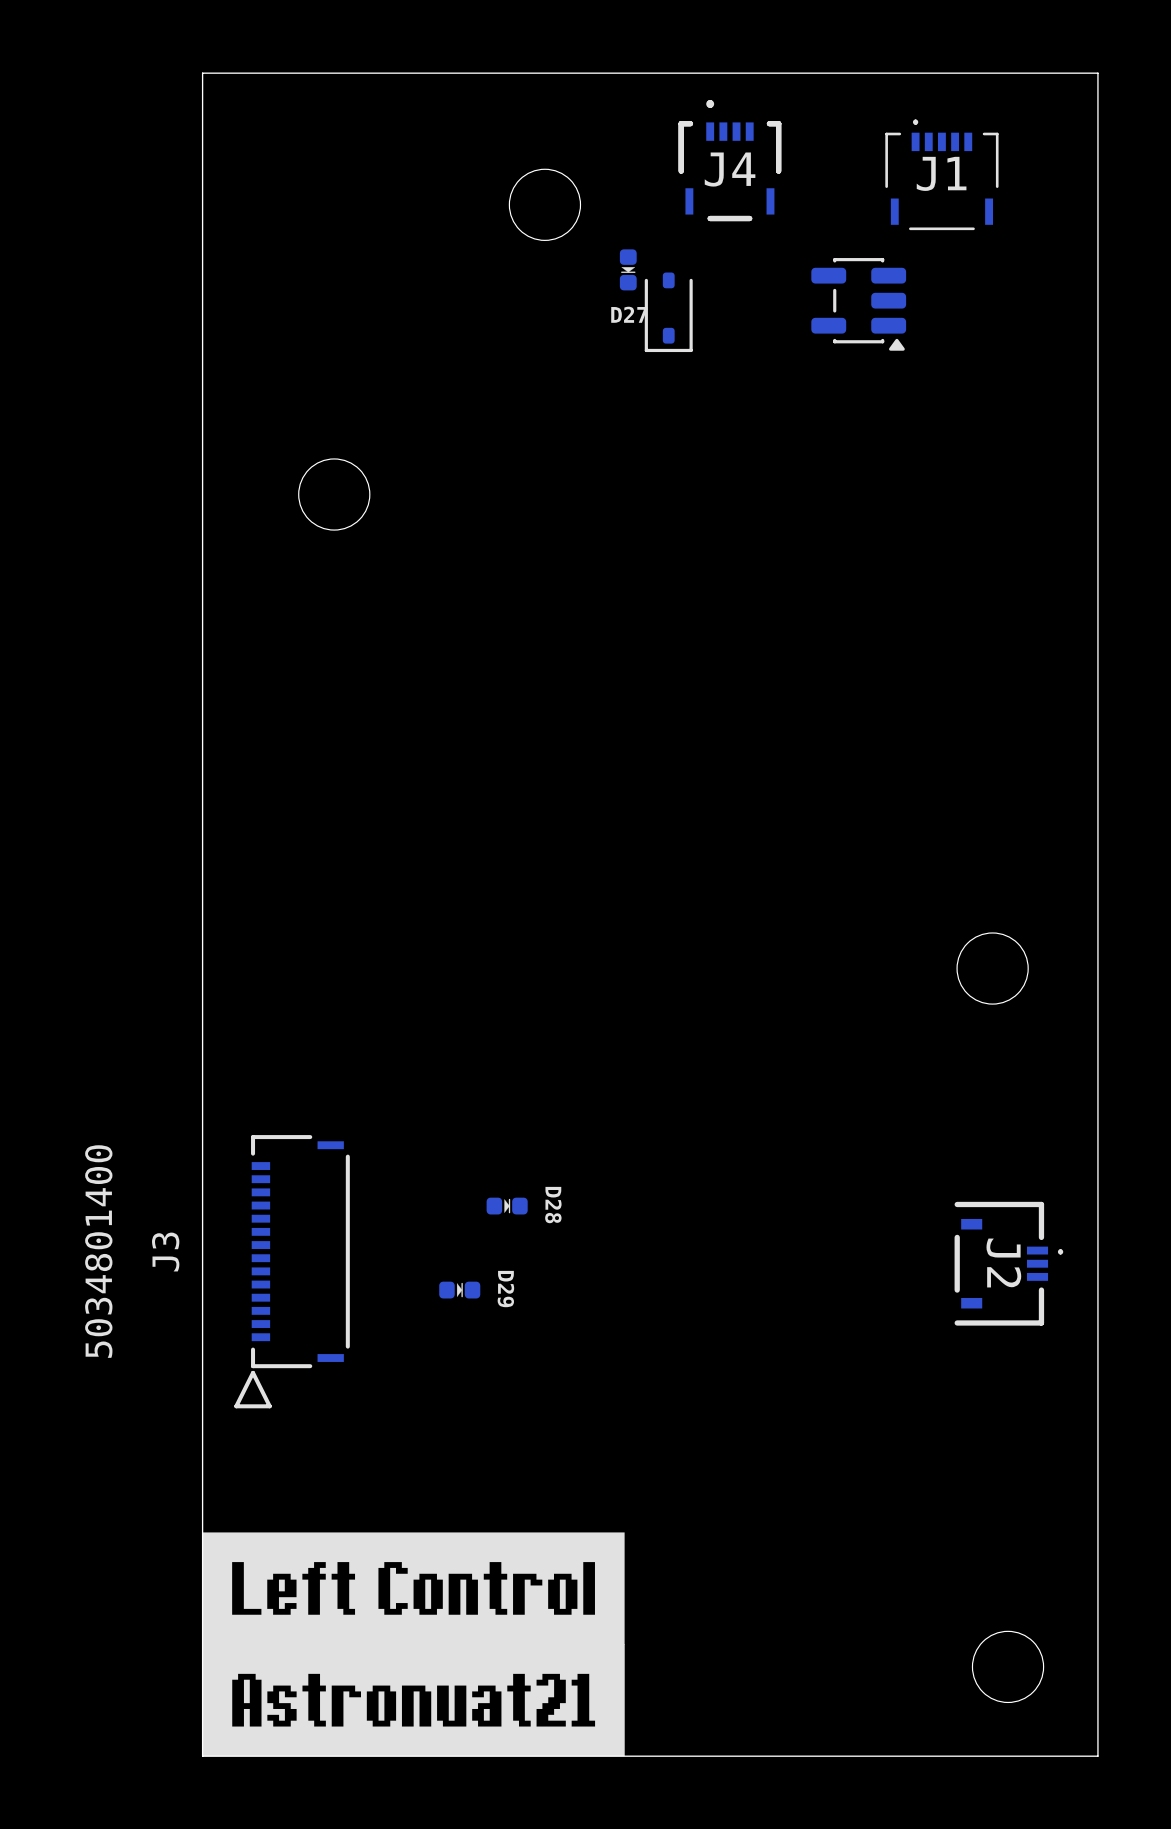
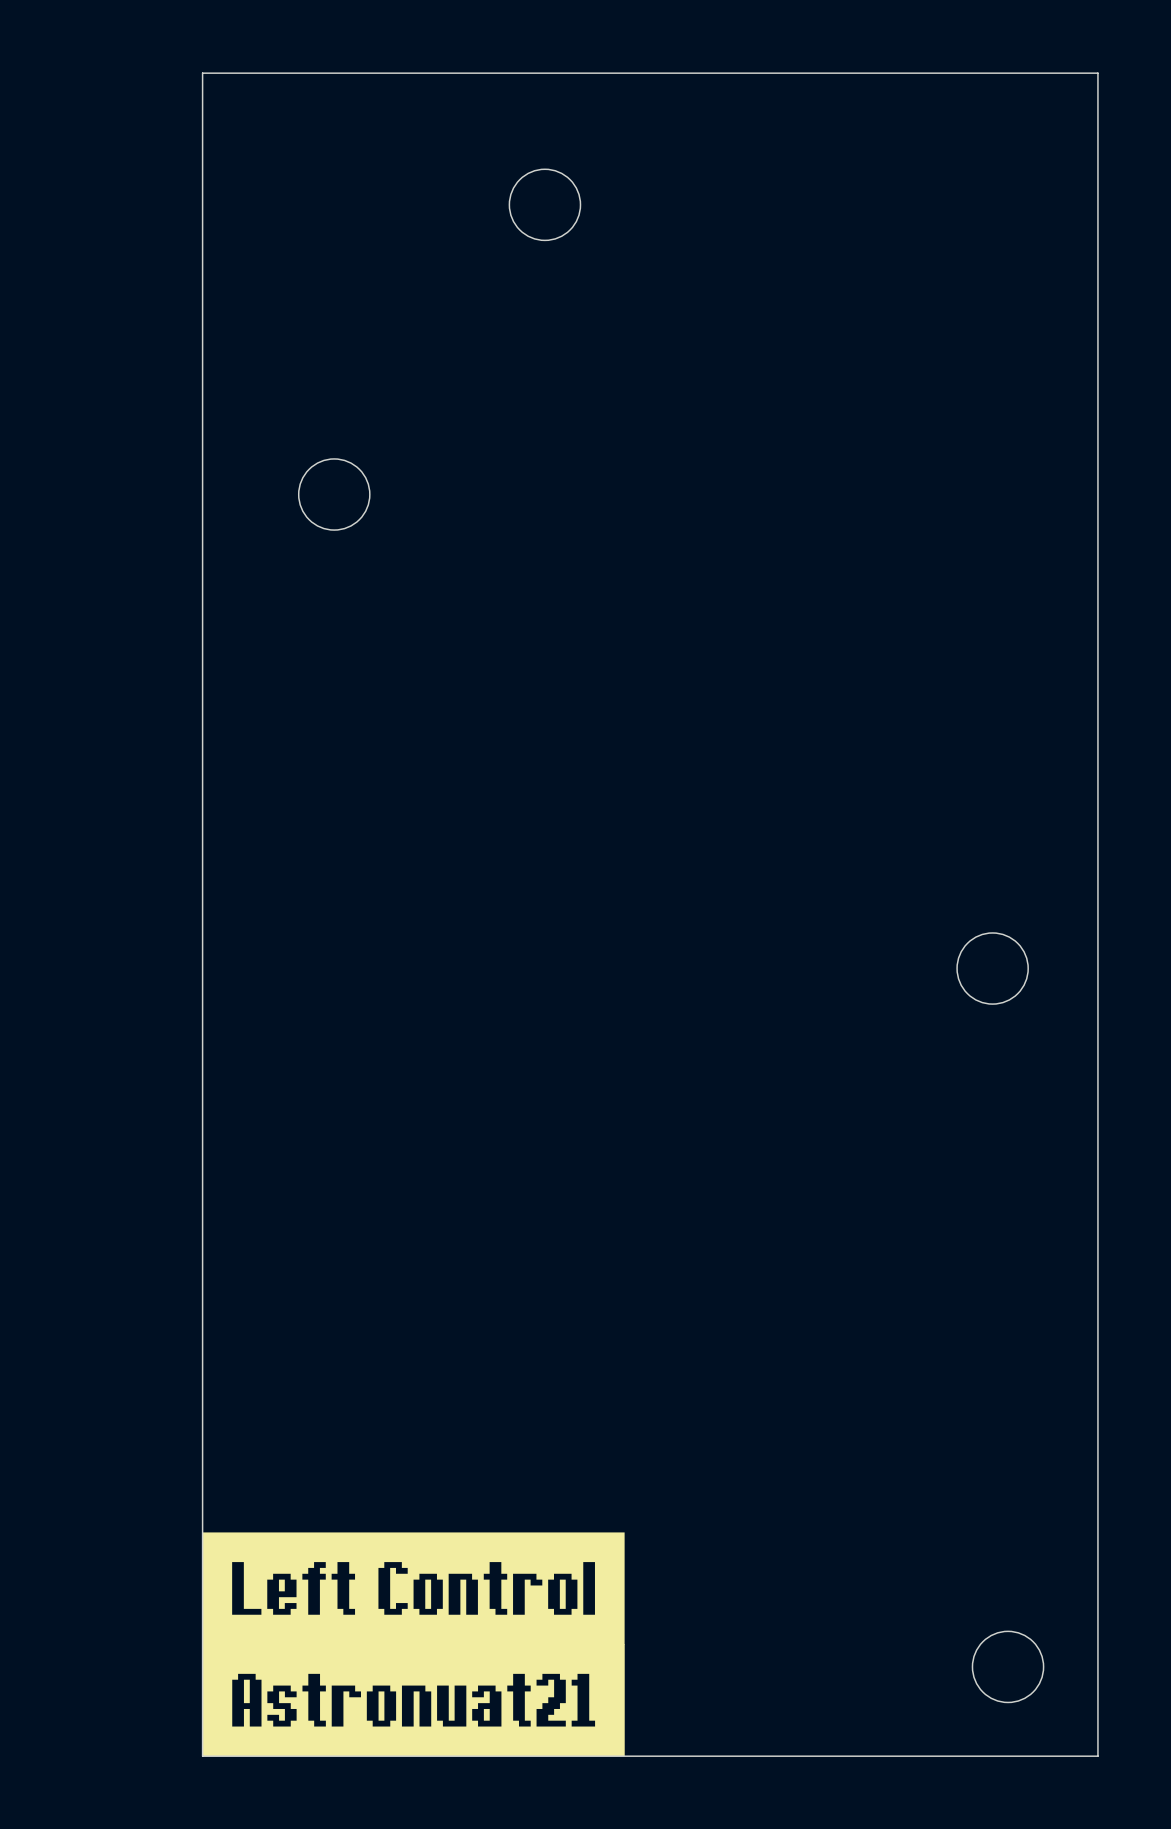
J4: (729, 160) -> none
J1: (941, 174) -> none
D27: (628, 269) -> none
part: (858, 304) -> none
part: (668, 312) -> none
D28: (507, 1206) -> none
J2: (1008, 1263) -> none
J3: (292, 1271) -> none
D29: (459, 1290) -> none

